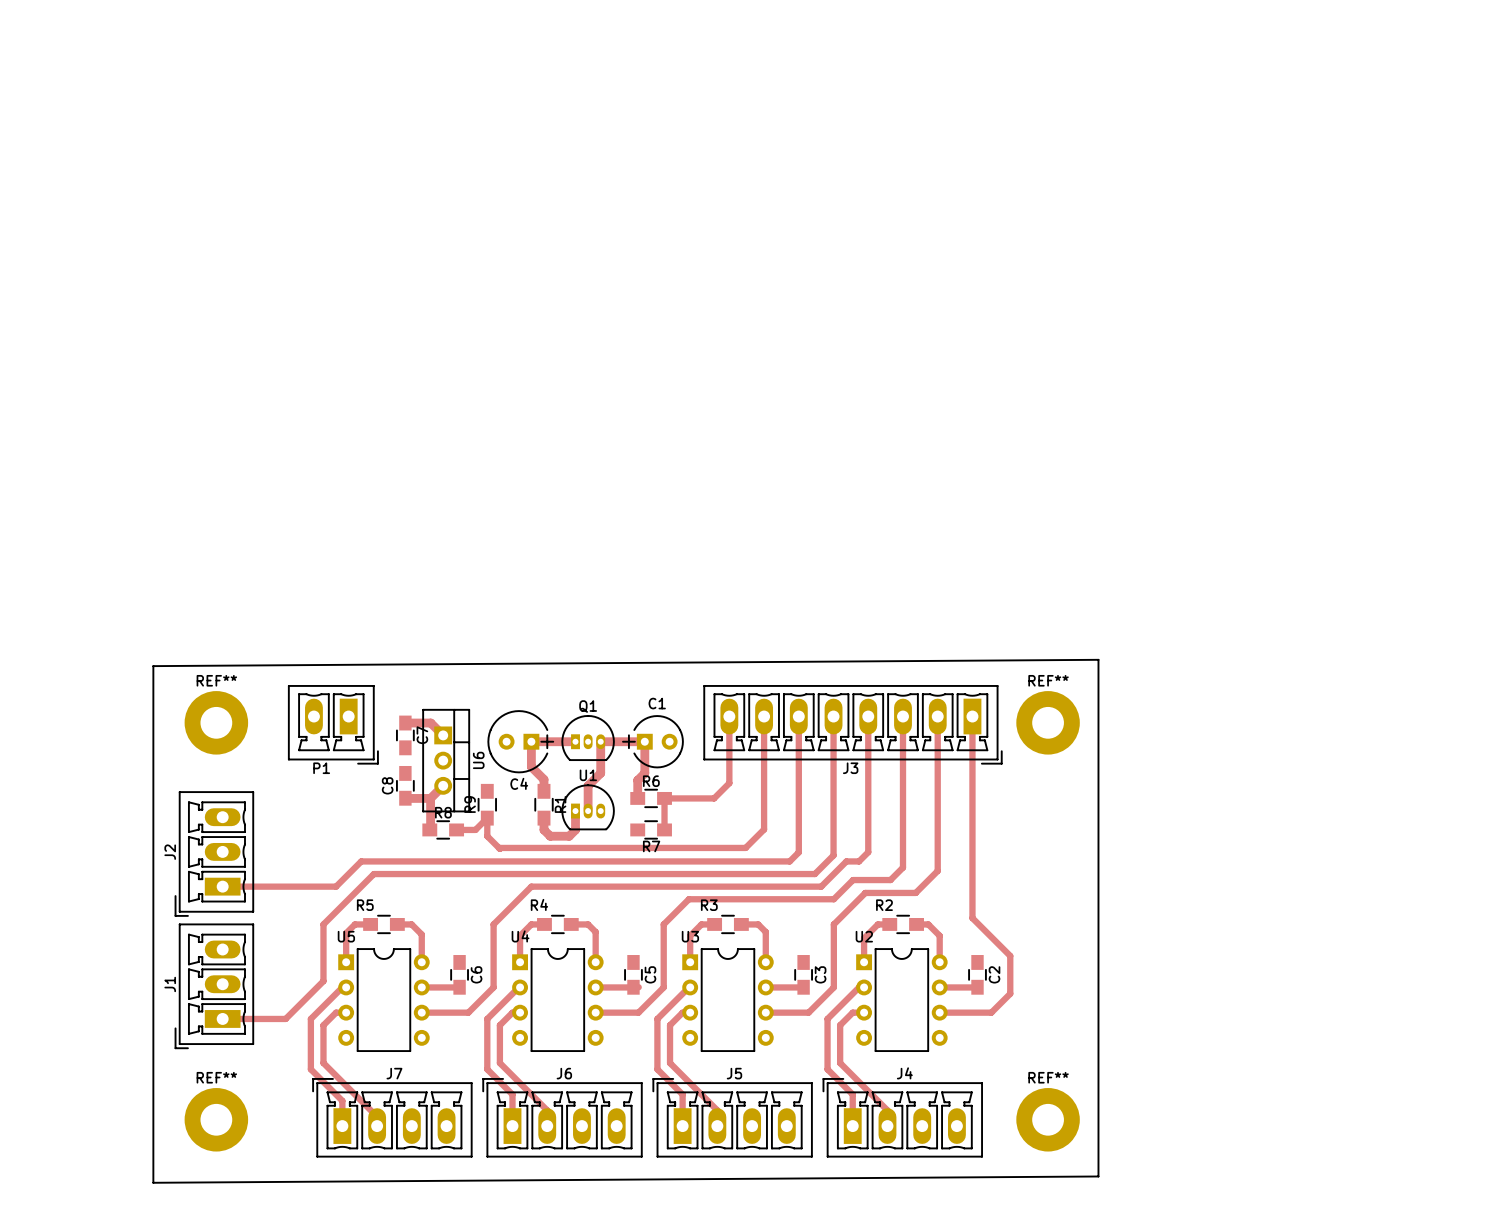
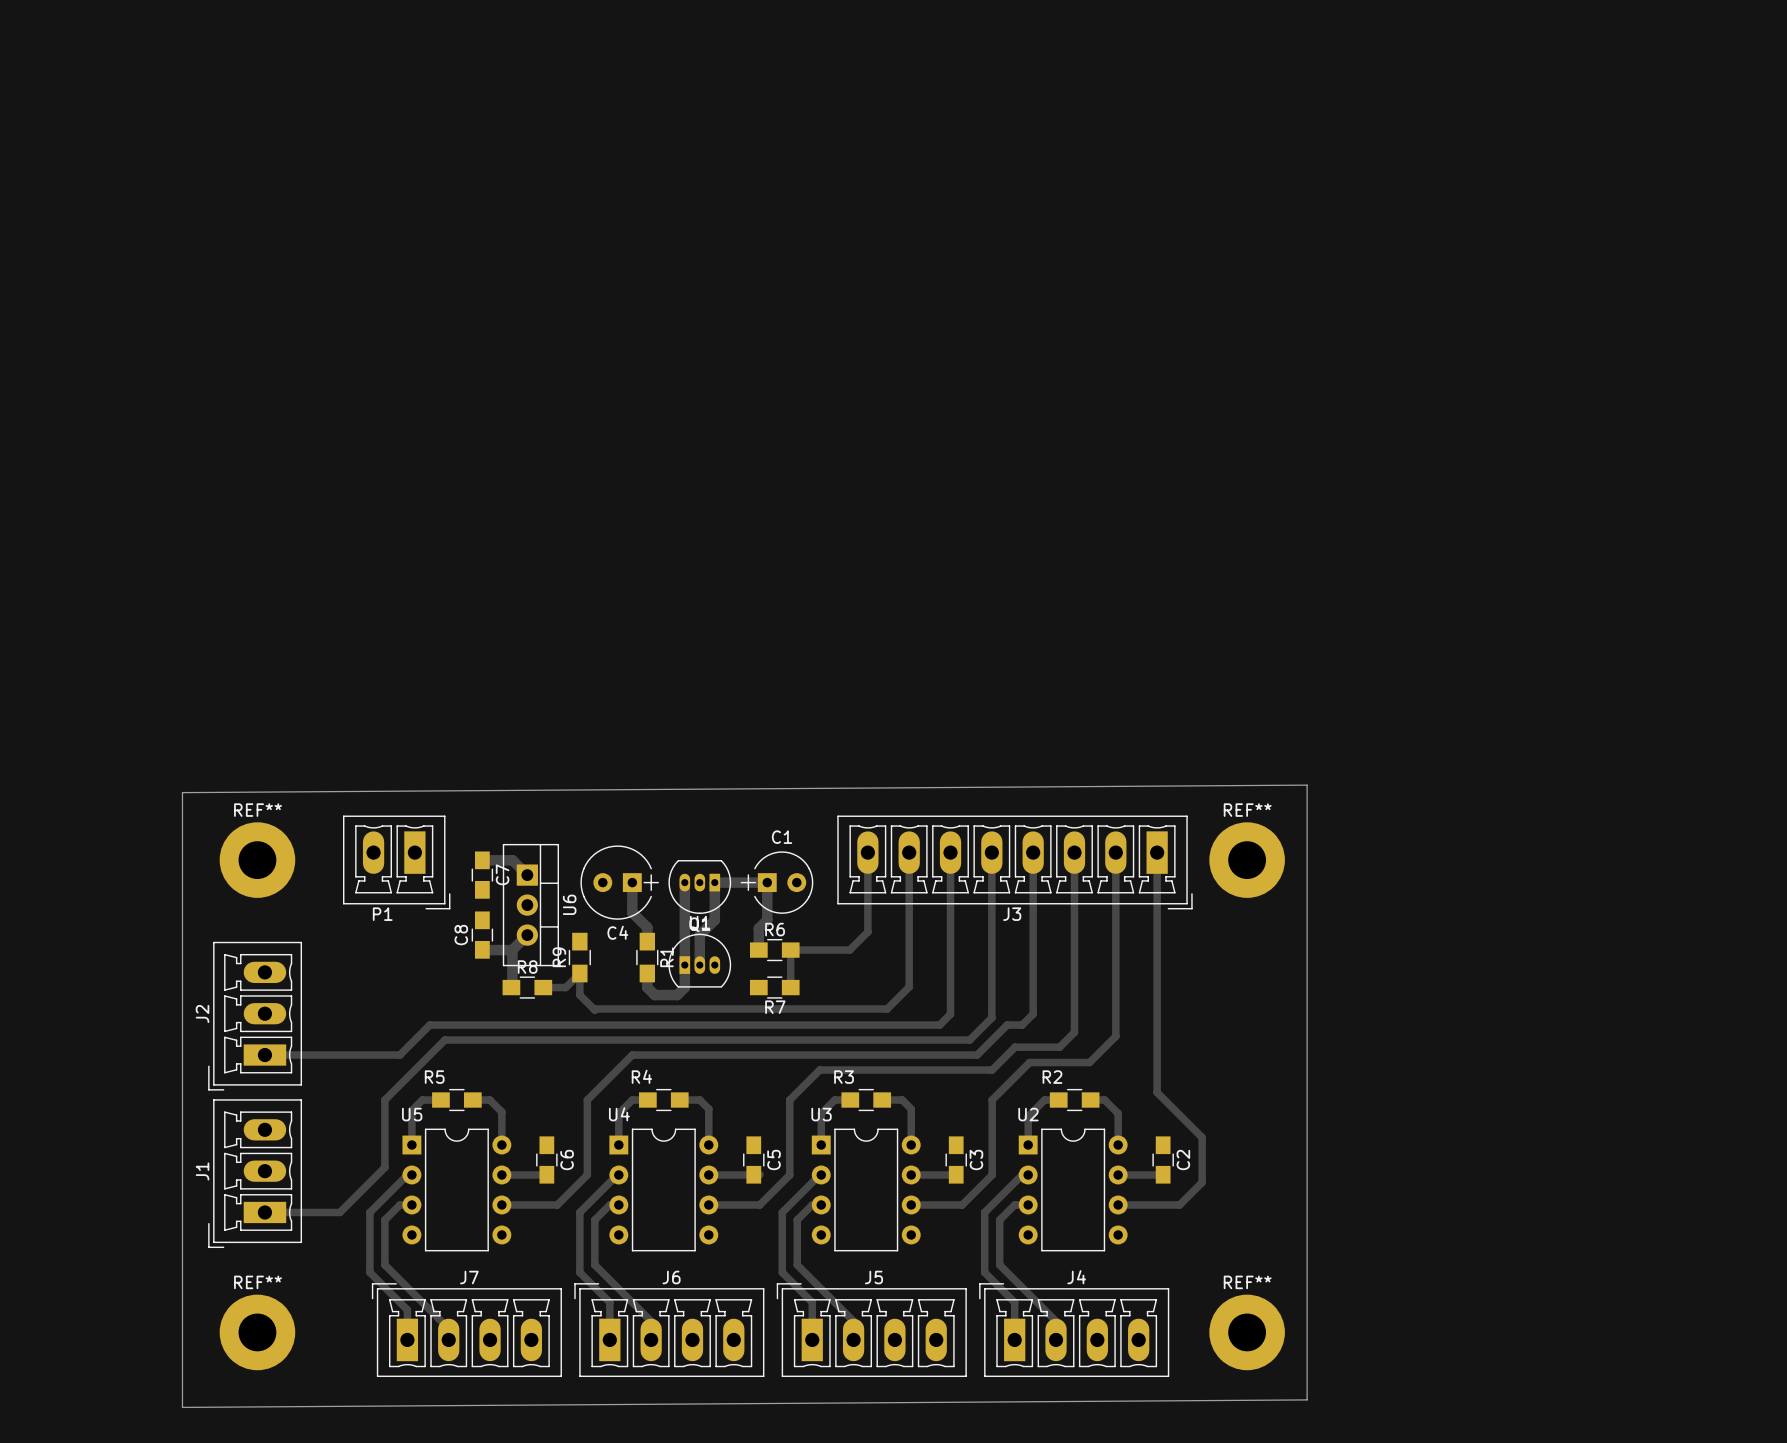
Q1 rotation: 0° (588, 738) -> 180° (699, 887)
track: (531, 741) (575, 741) -> (684, 965) (684, 882)

